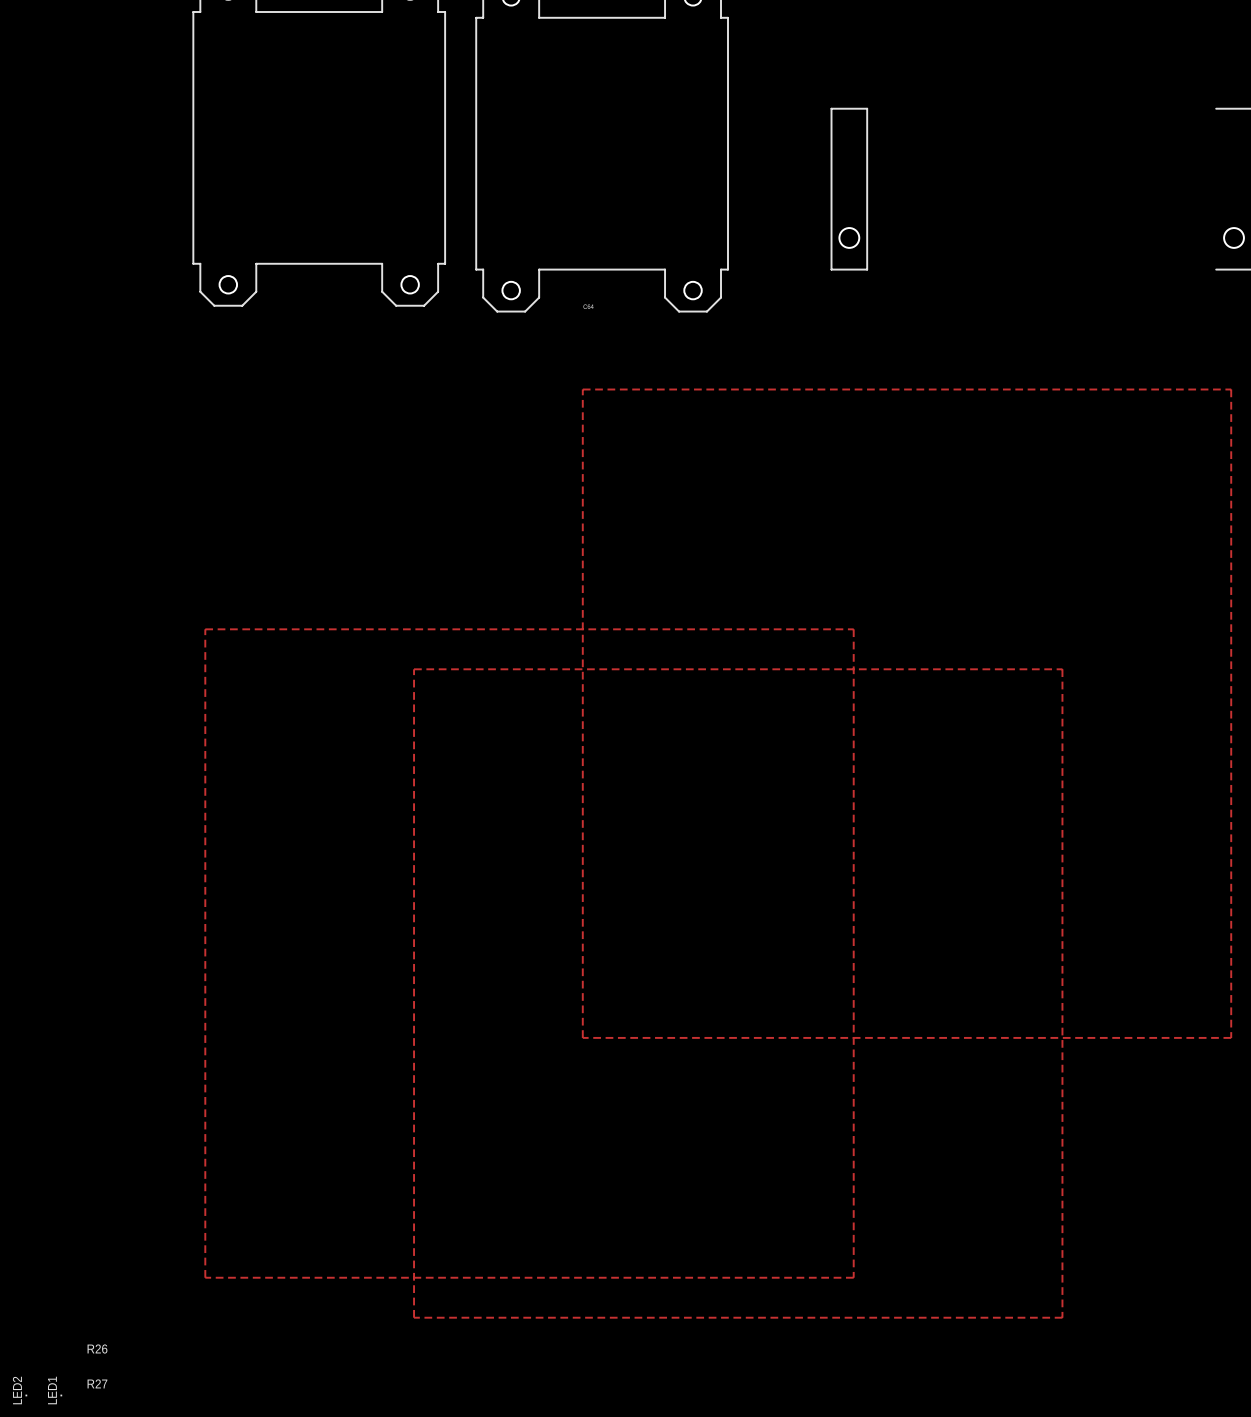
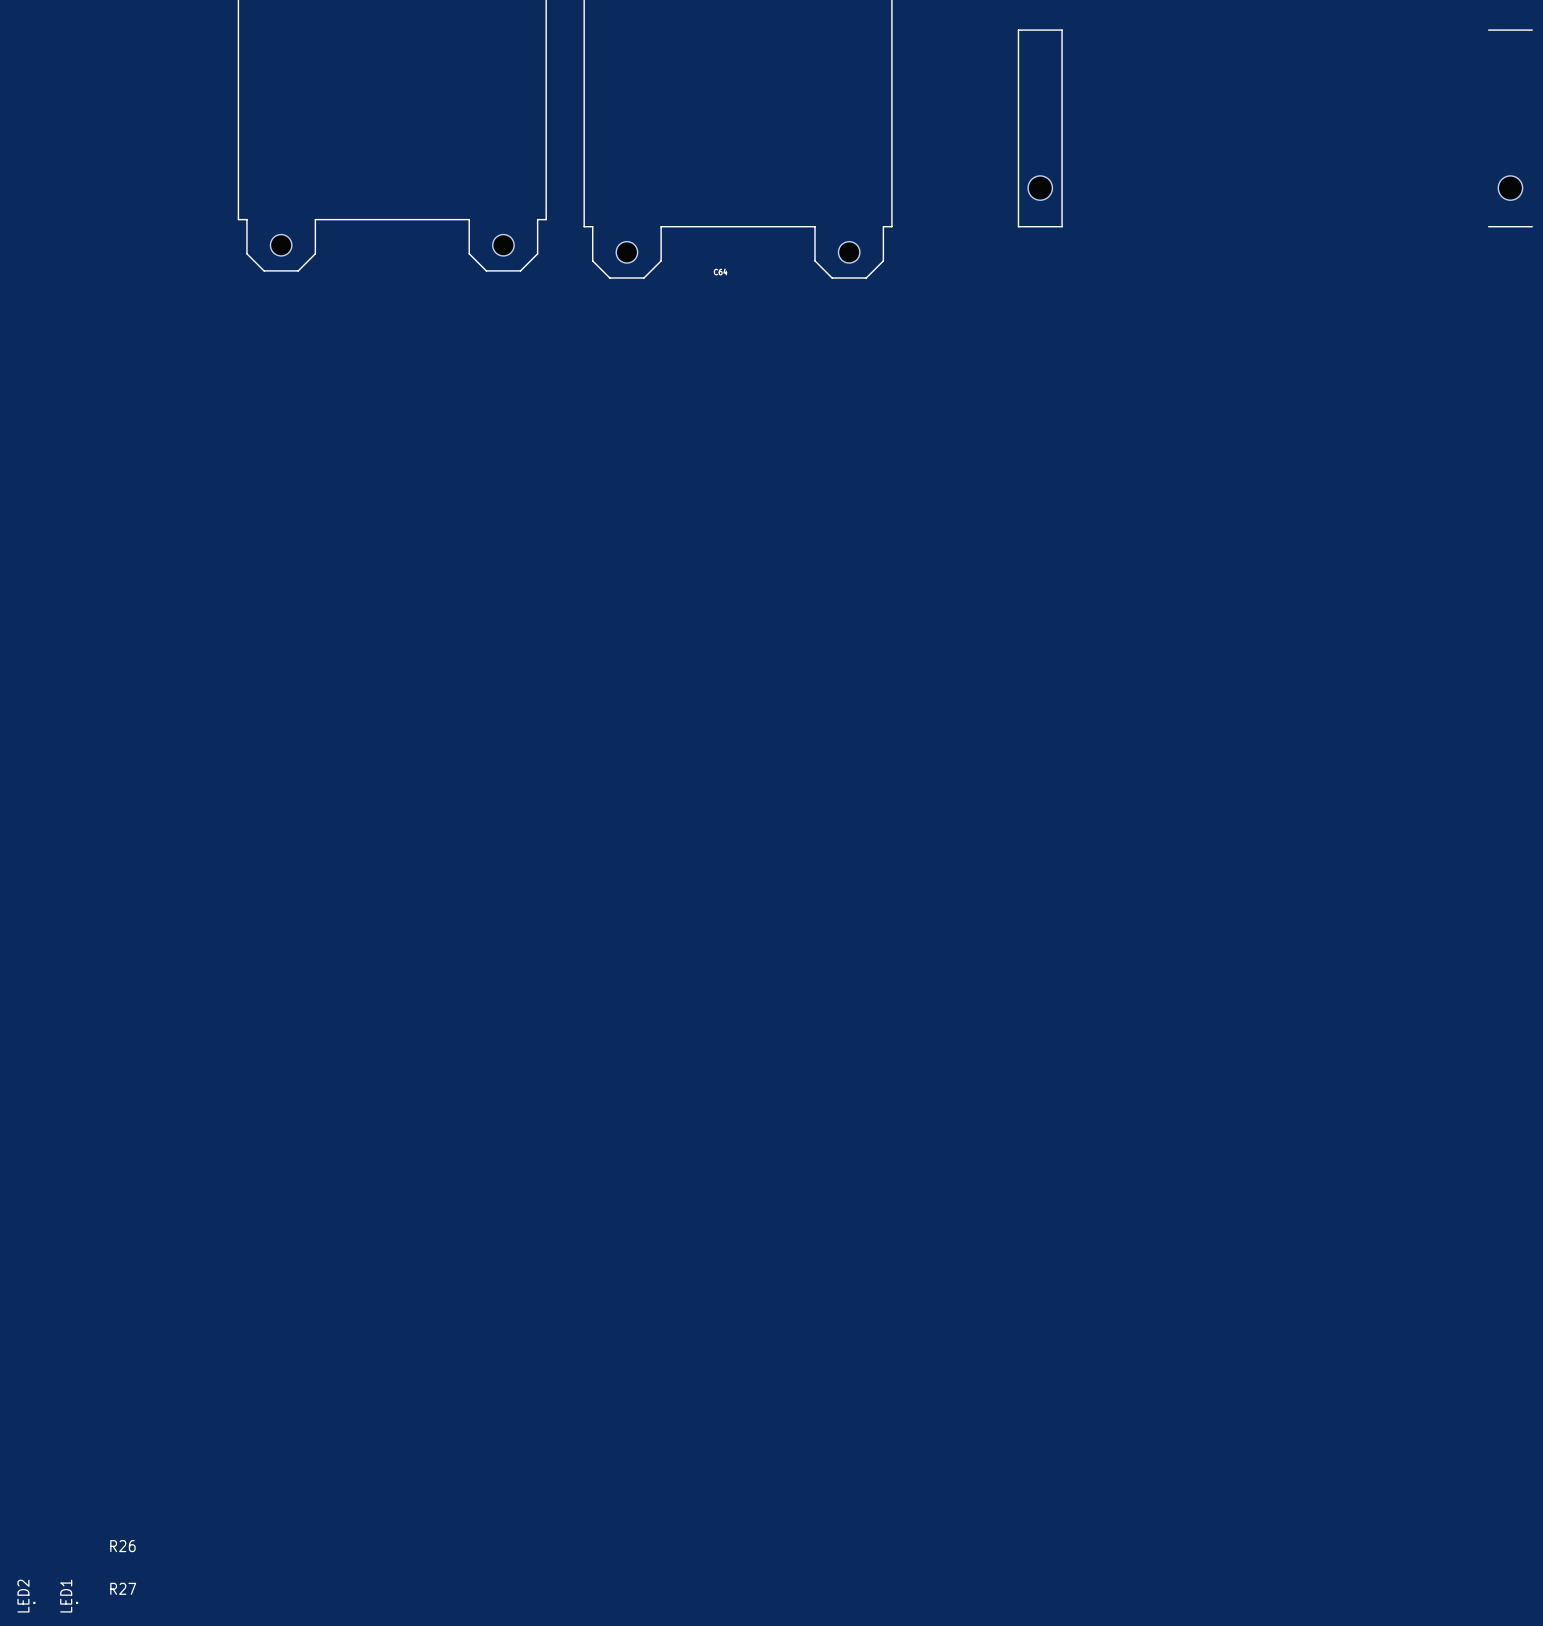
zone outline: (582, 389) (1231, 389) (1231, 1037) (582, 1037) (582, 389) -> none
zone outline: (205, 629) (853, 629) (853, 1277) (205, 1277) (205, 629) -> none
zone outline: (414, 669) (1062, 669) (1062, 1317) (414, 1317) (414, 669) -> none

